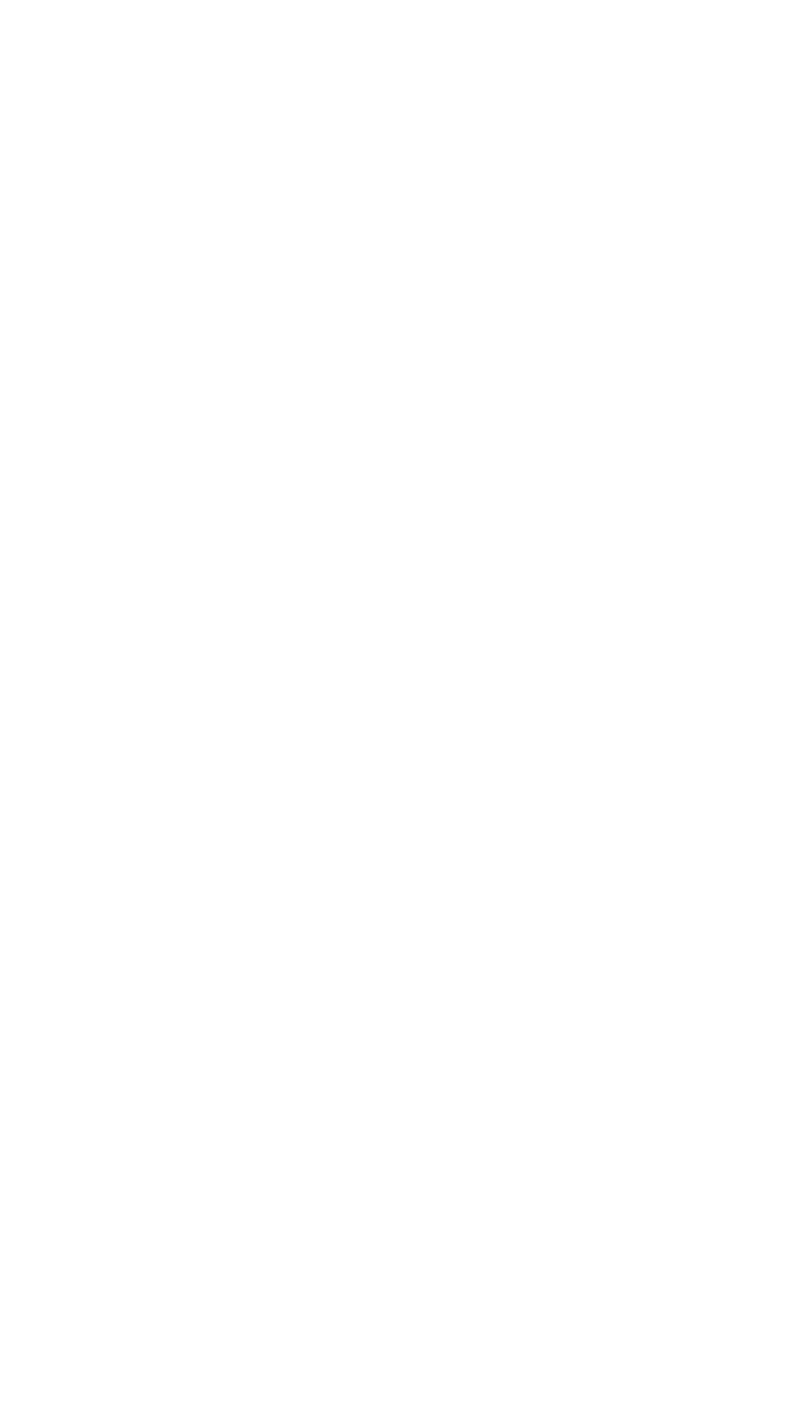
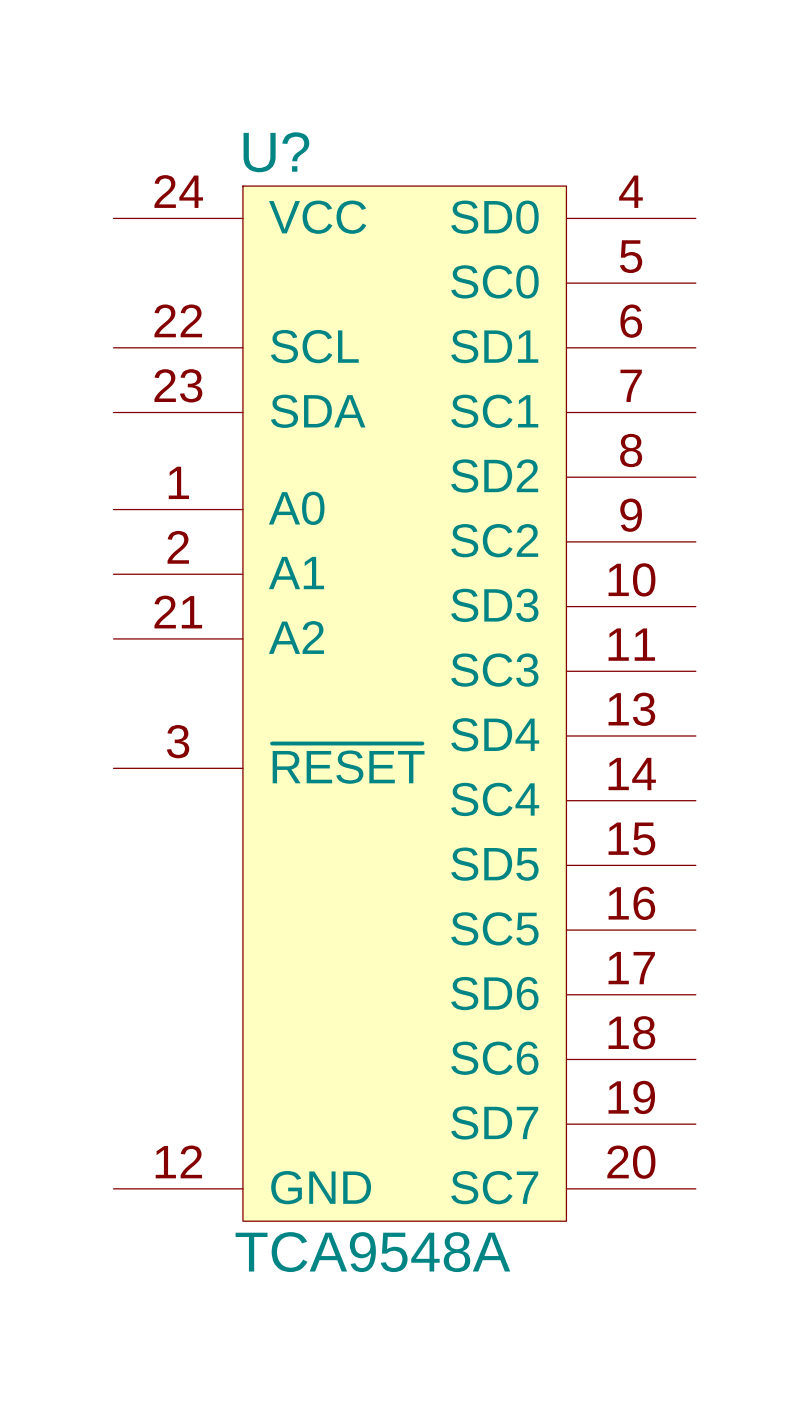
U?: none -> TCA9548A (404, 703)

